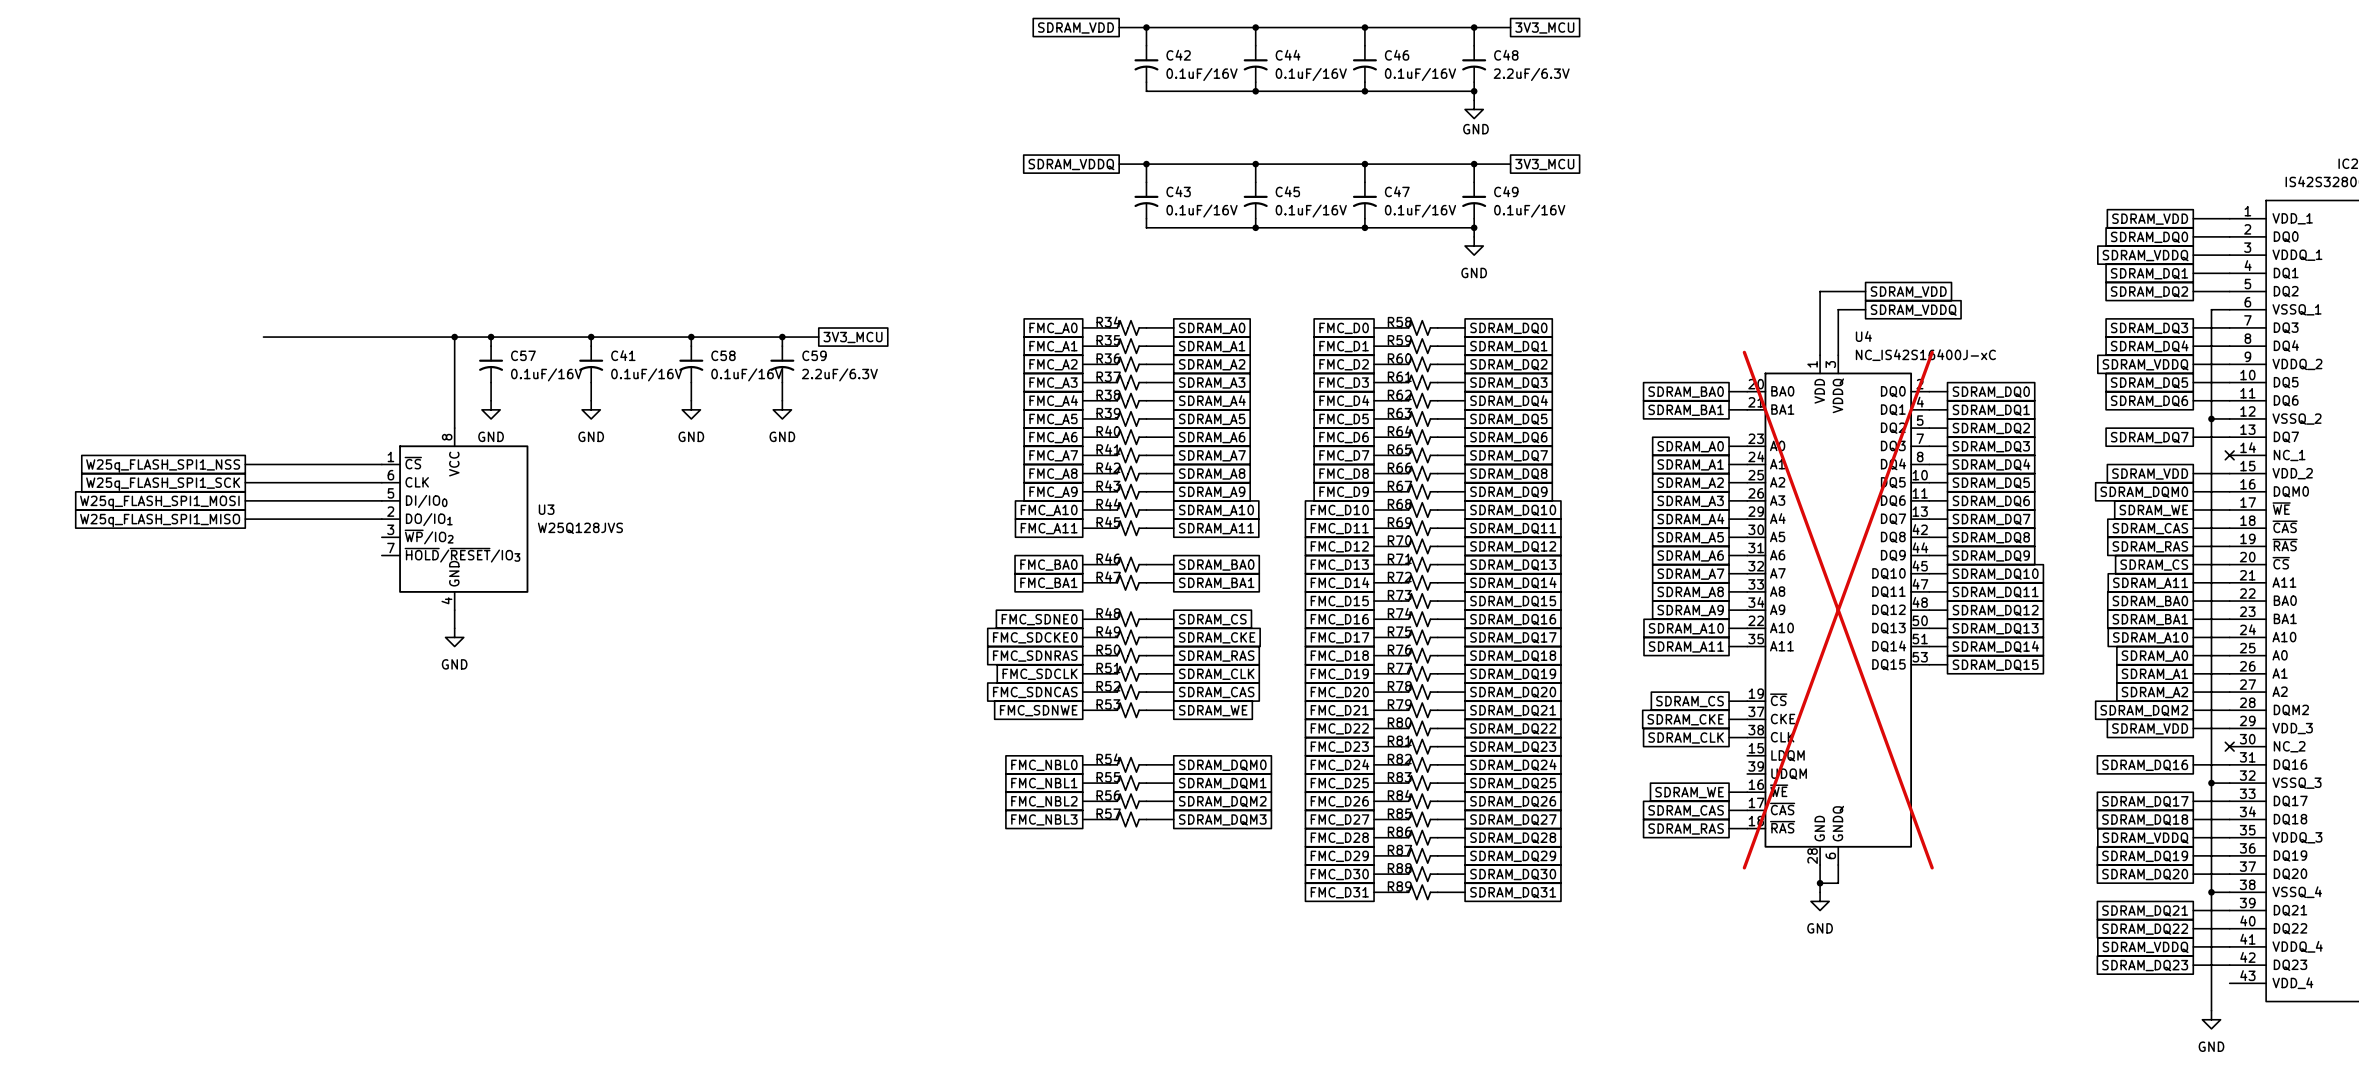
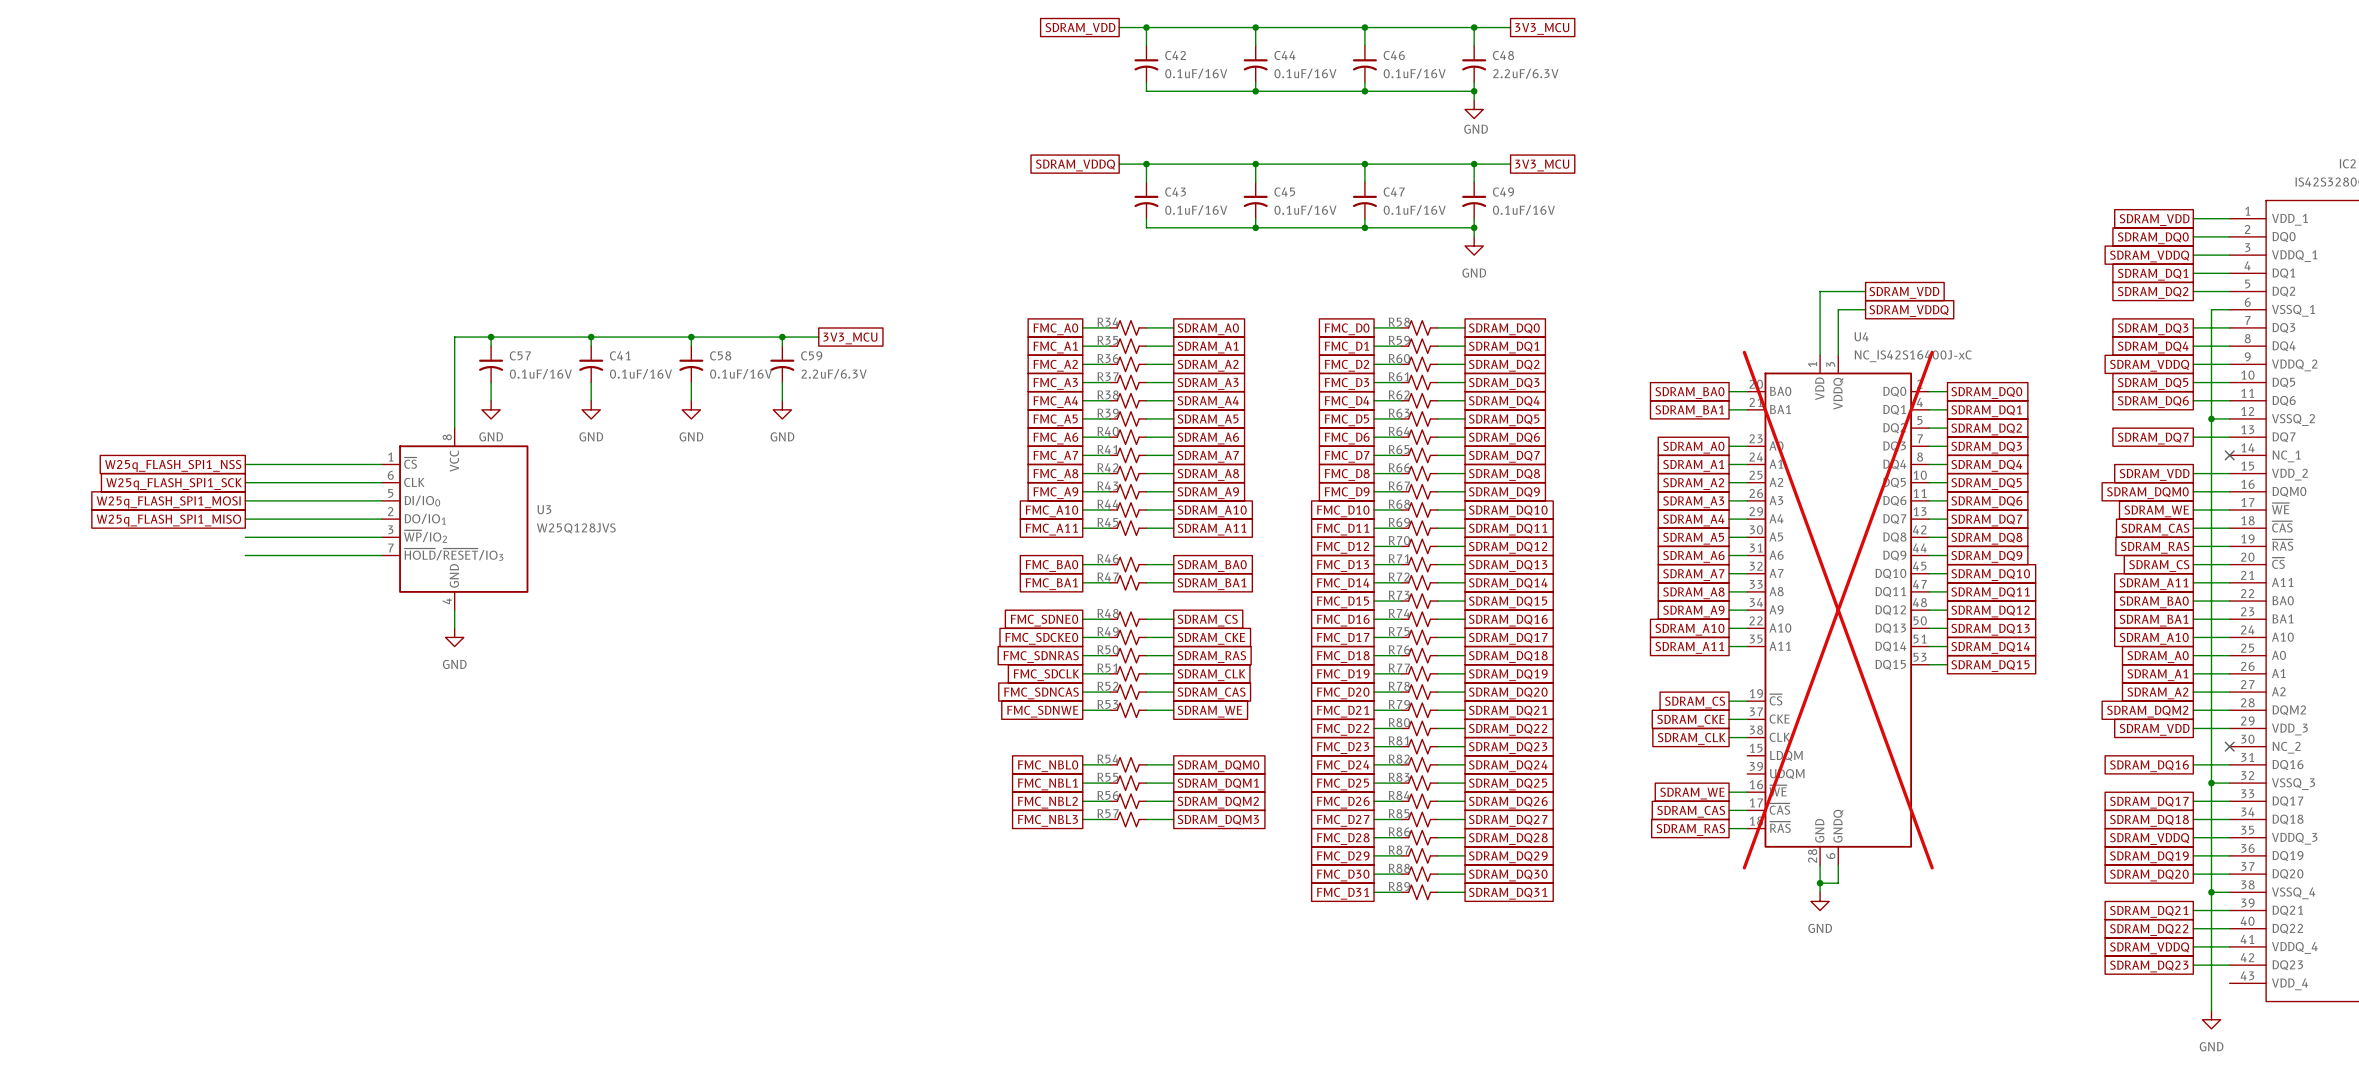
wire: (263, 337) (454, 337) -> none
junction: (454, 337) -> none
wire: none -> (245, 537) (381, 537)
wire: none -> (245, 555) (381, 555)

